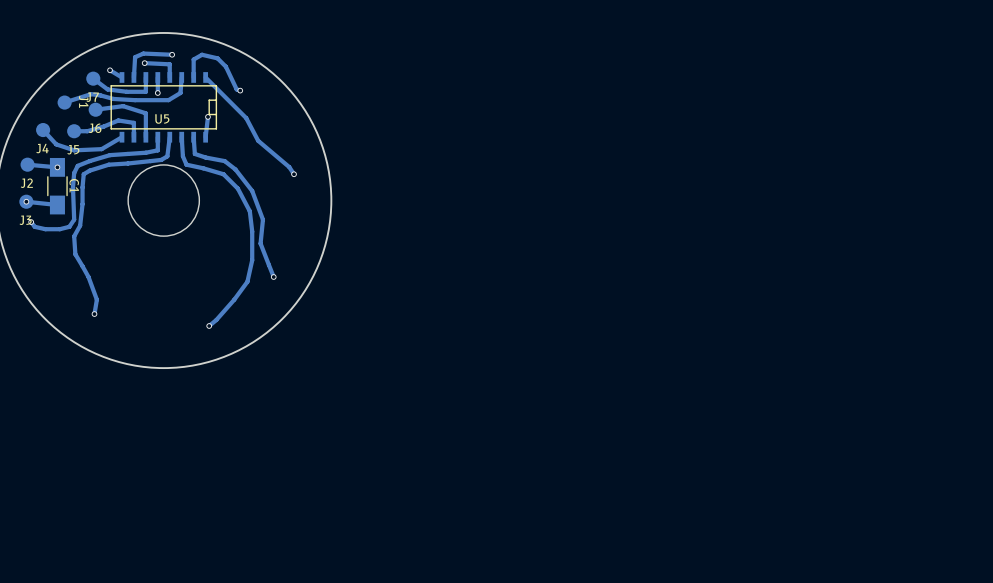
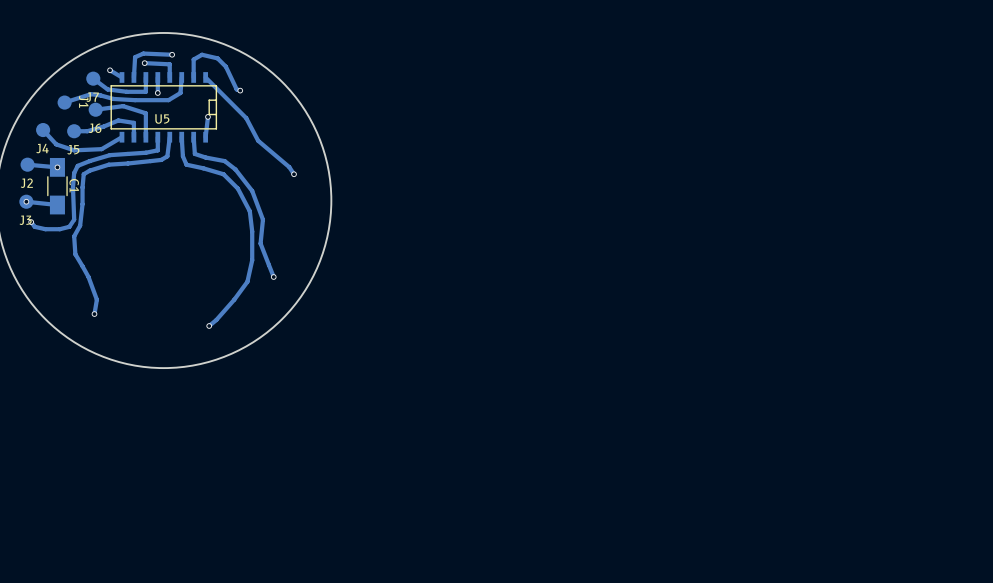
round board edge: [127, 164, 201, 237] -> none

